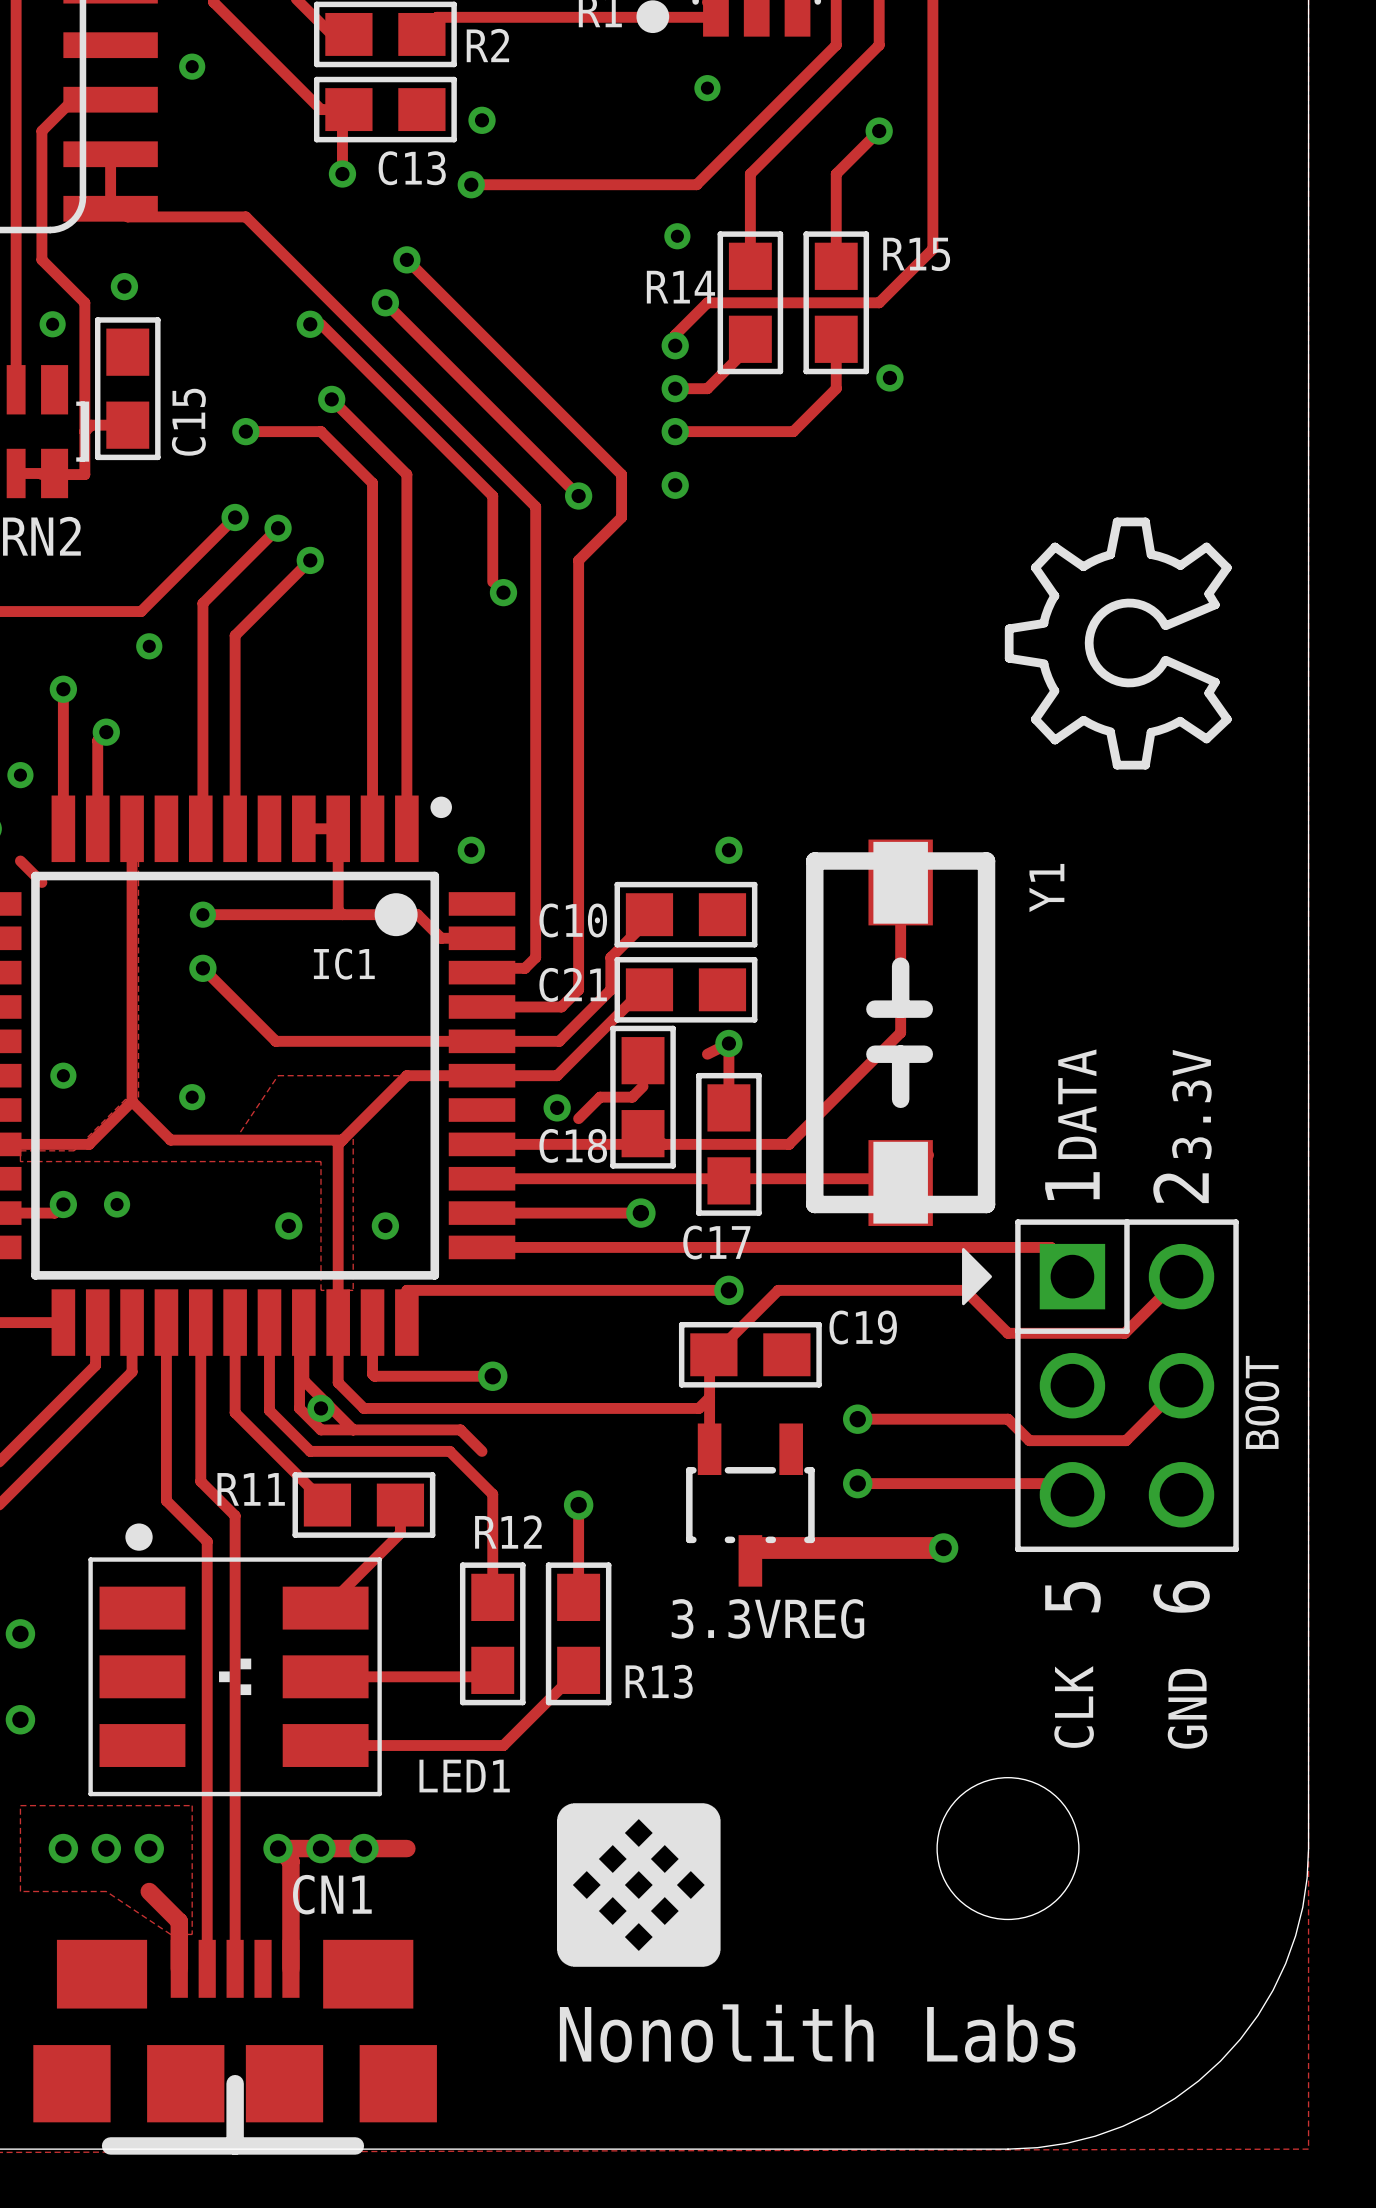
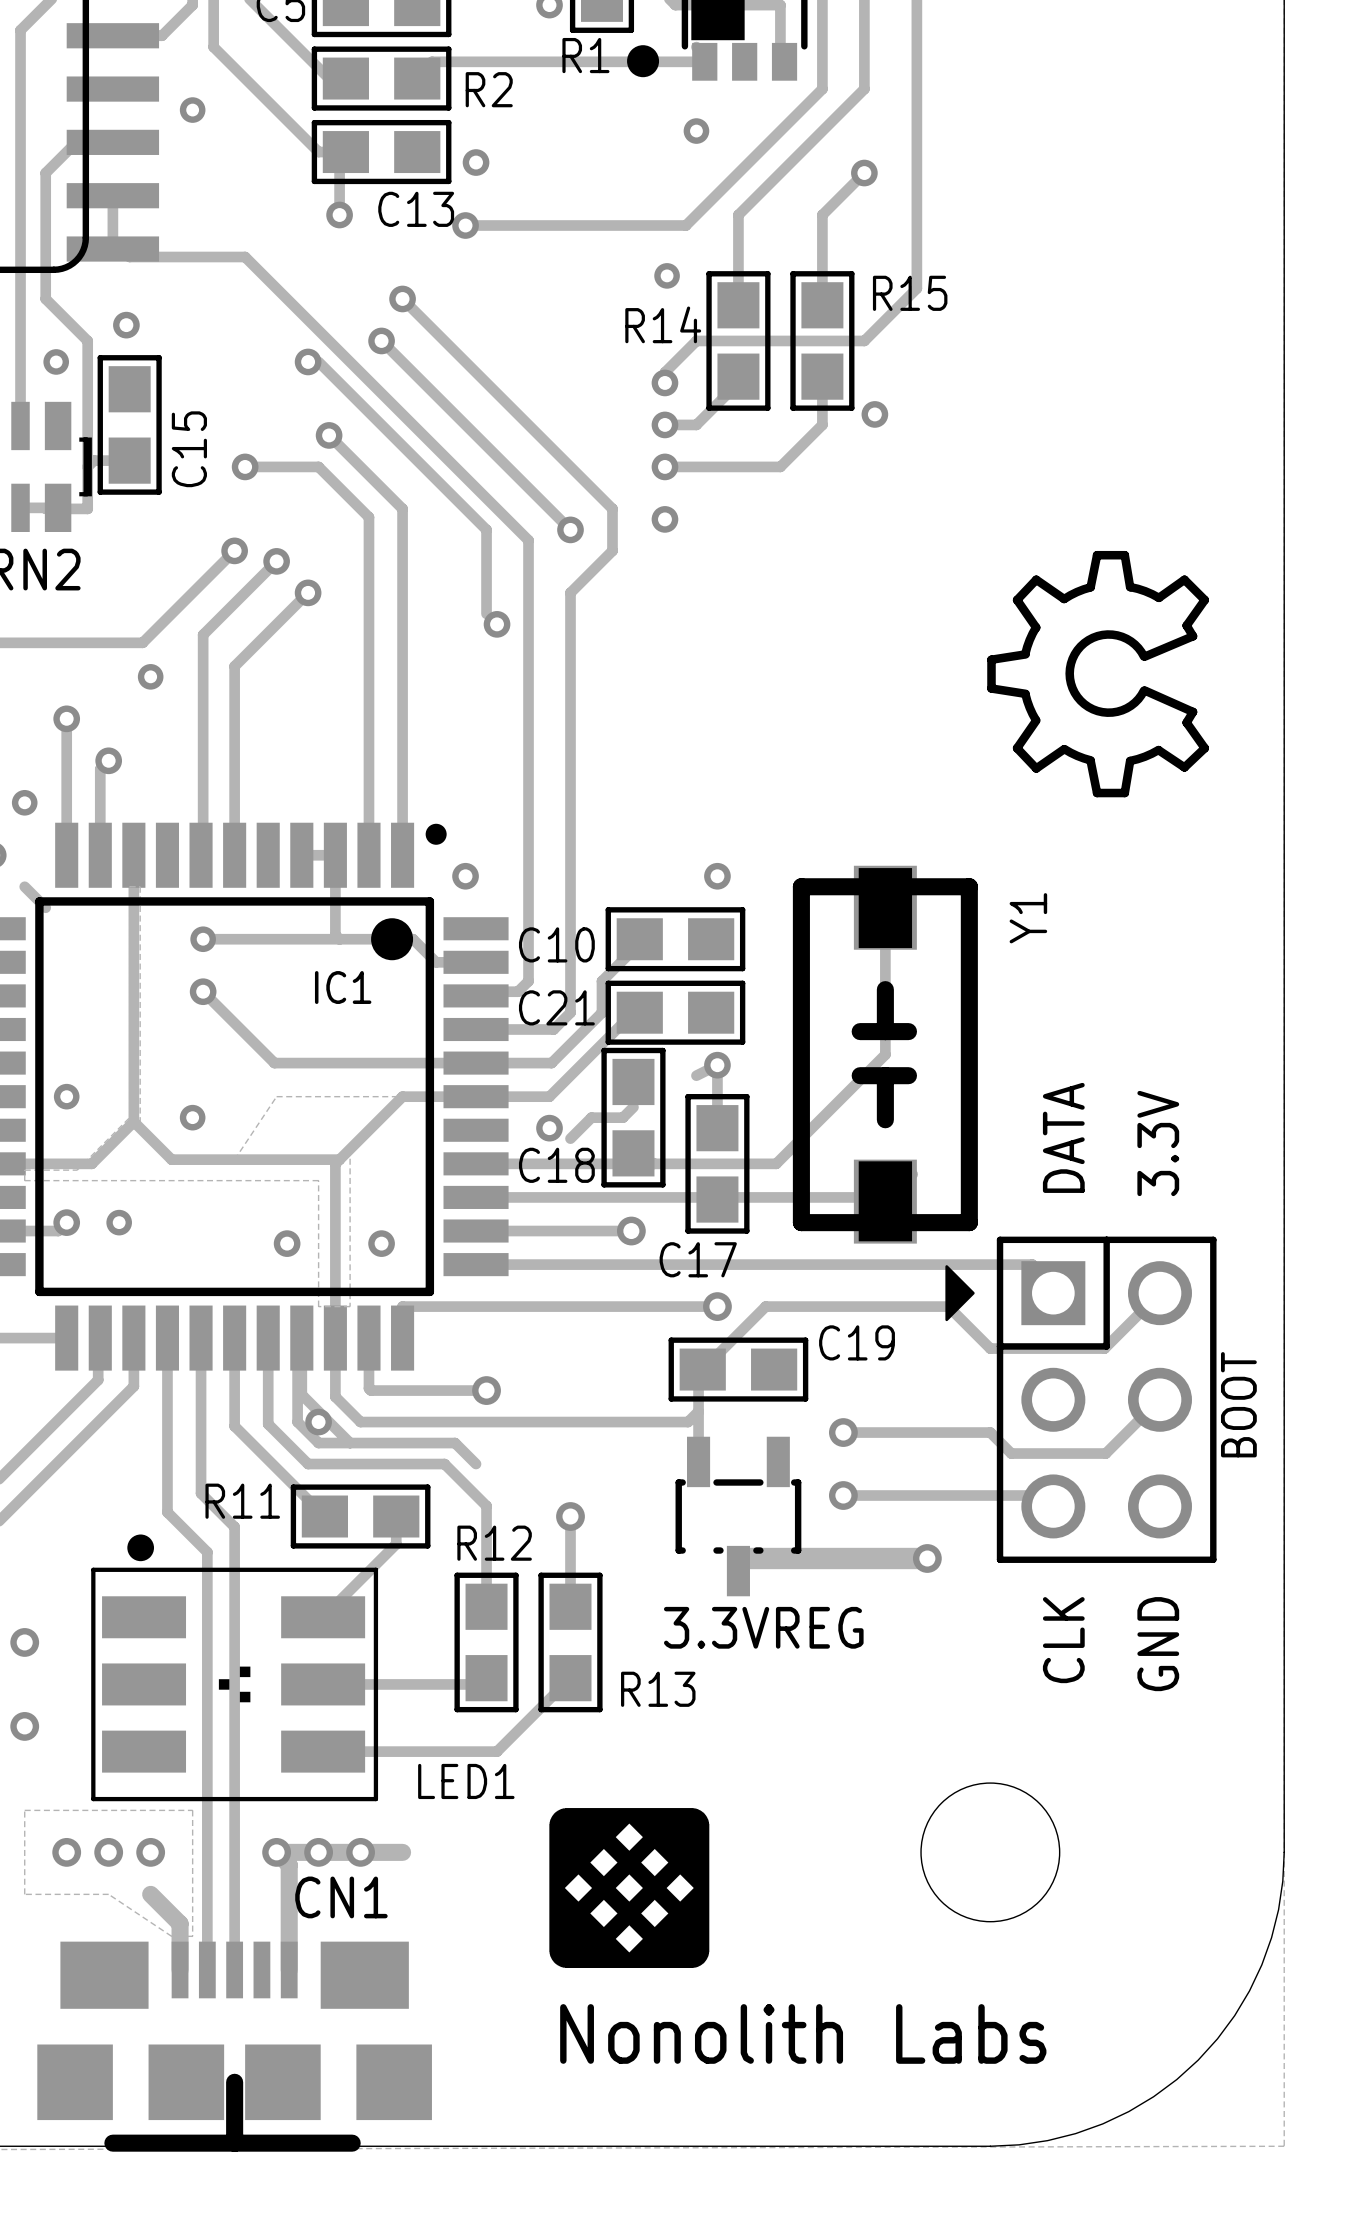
text position: DATA (1077, 1104) -> DATA (1063, 1137)
text position: 3.3V (1191, 1104) -> 3.3V (1158, 1143)
part footprint: [962, 1219, 1239, 1553] -> [945, 1236, 1217, 1563]
text position: CLK (1074, 1706) -> CLK (1063, 1640)
text position: GND (1187, 1708) -> GND (1158, 1644)

